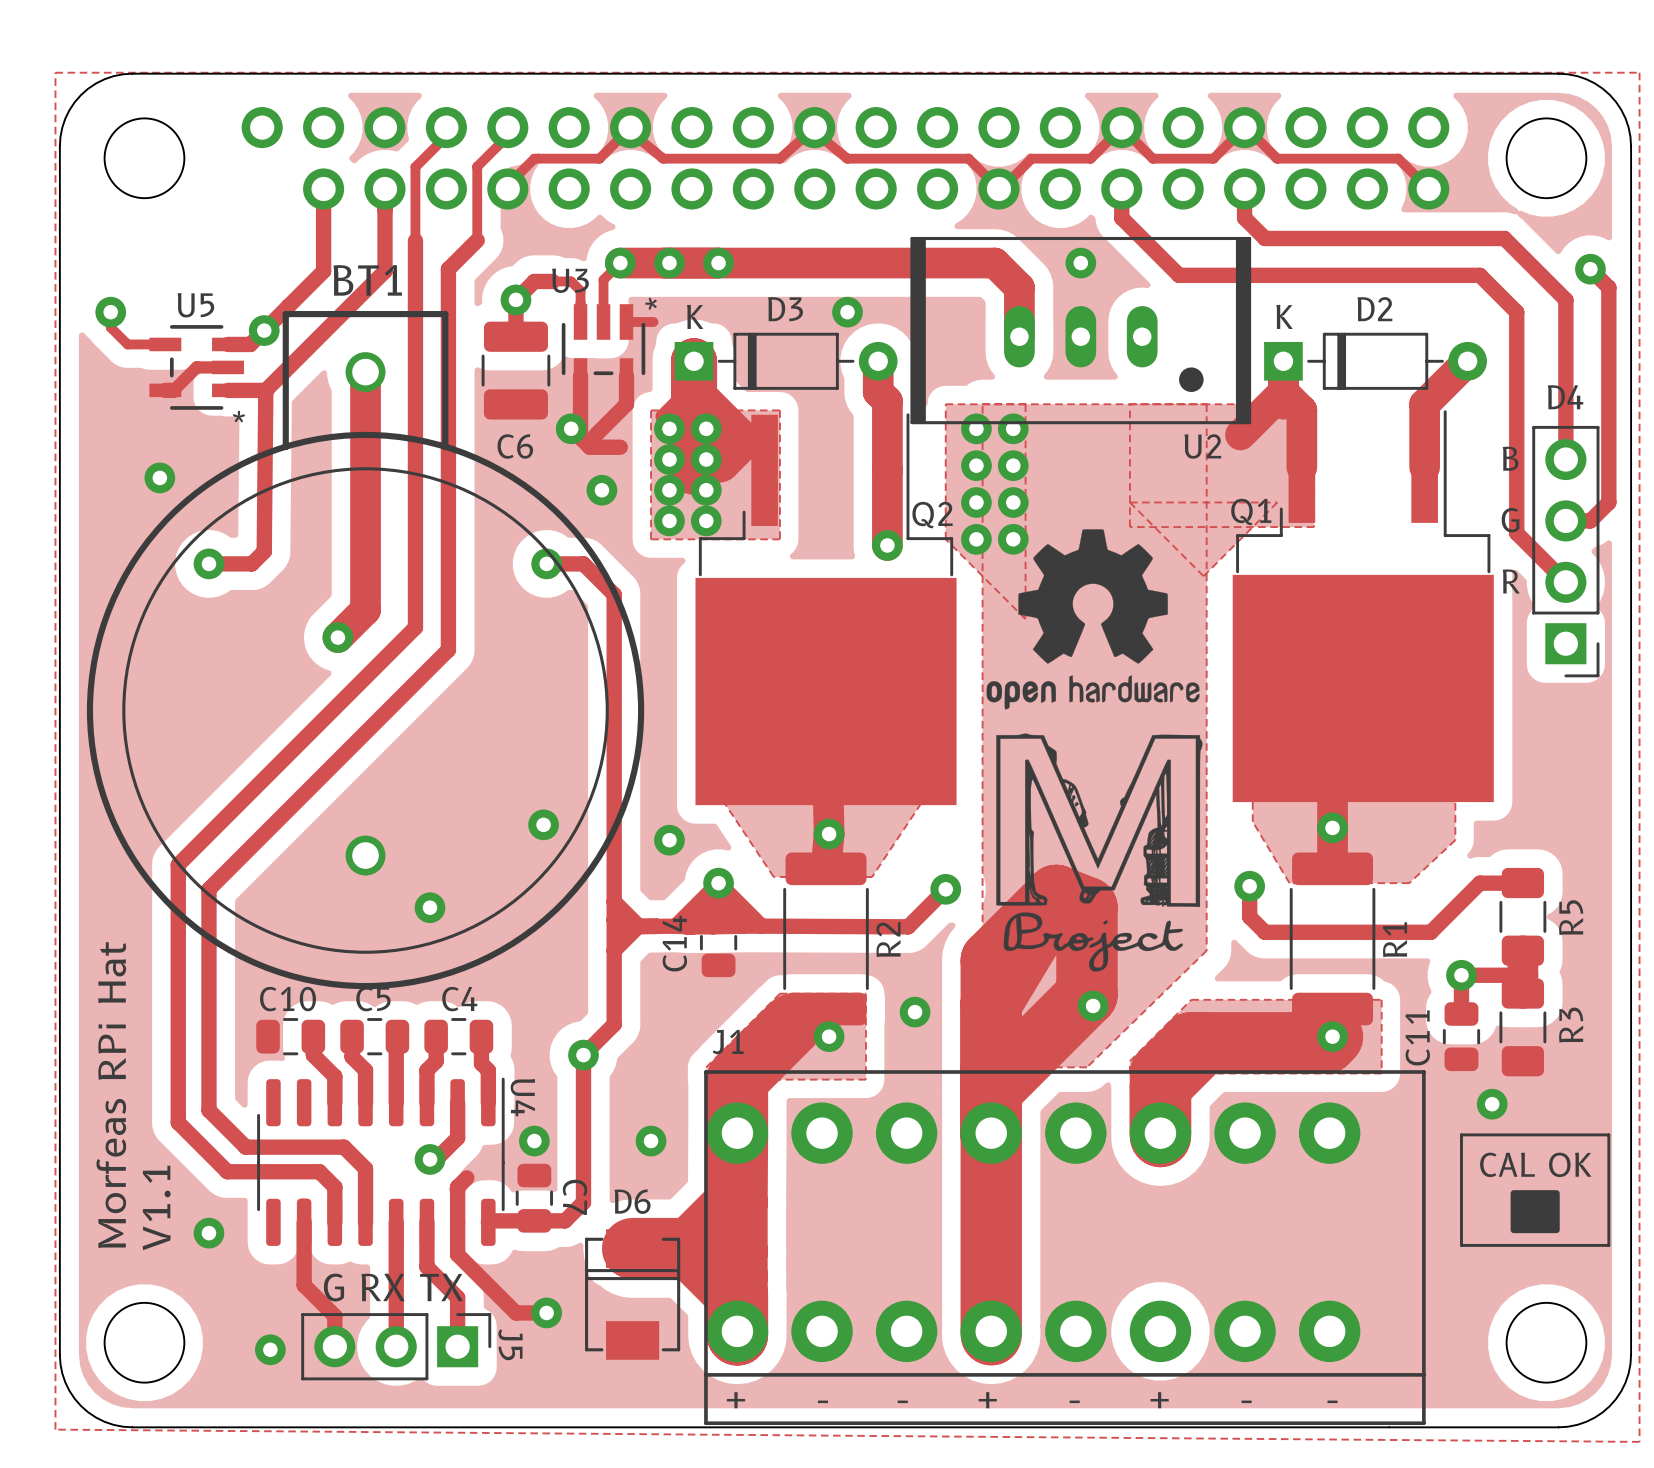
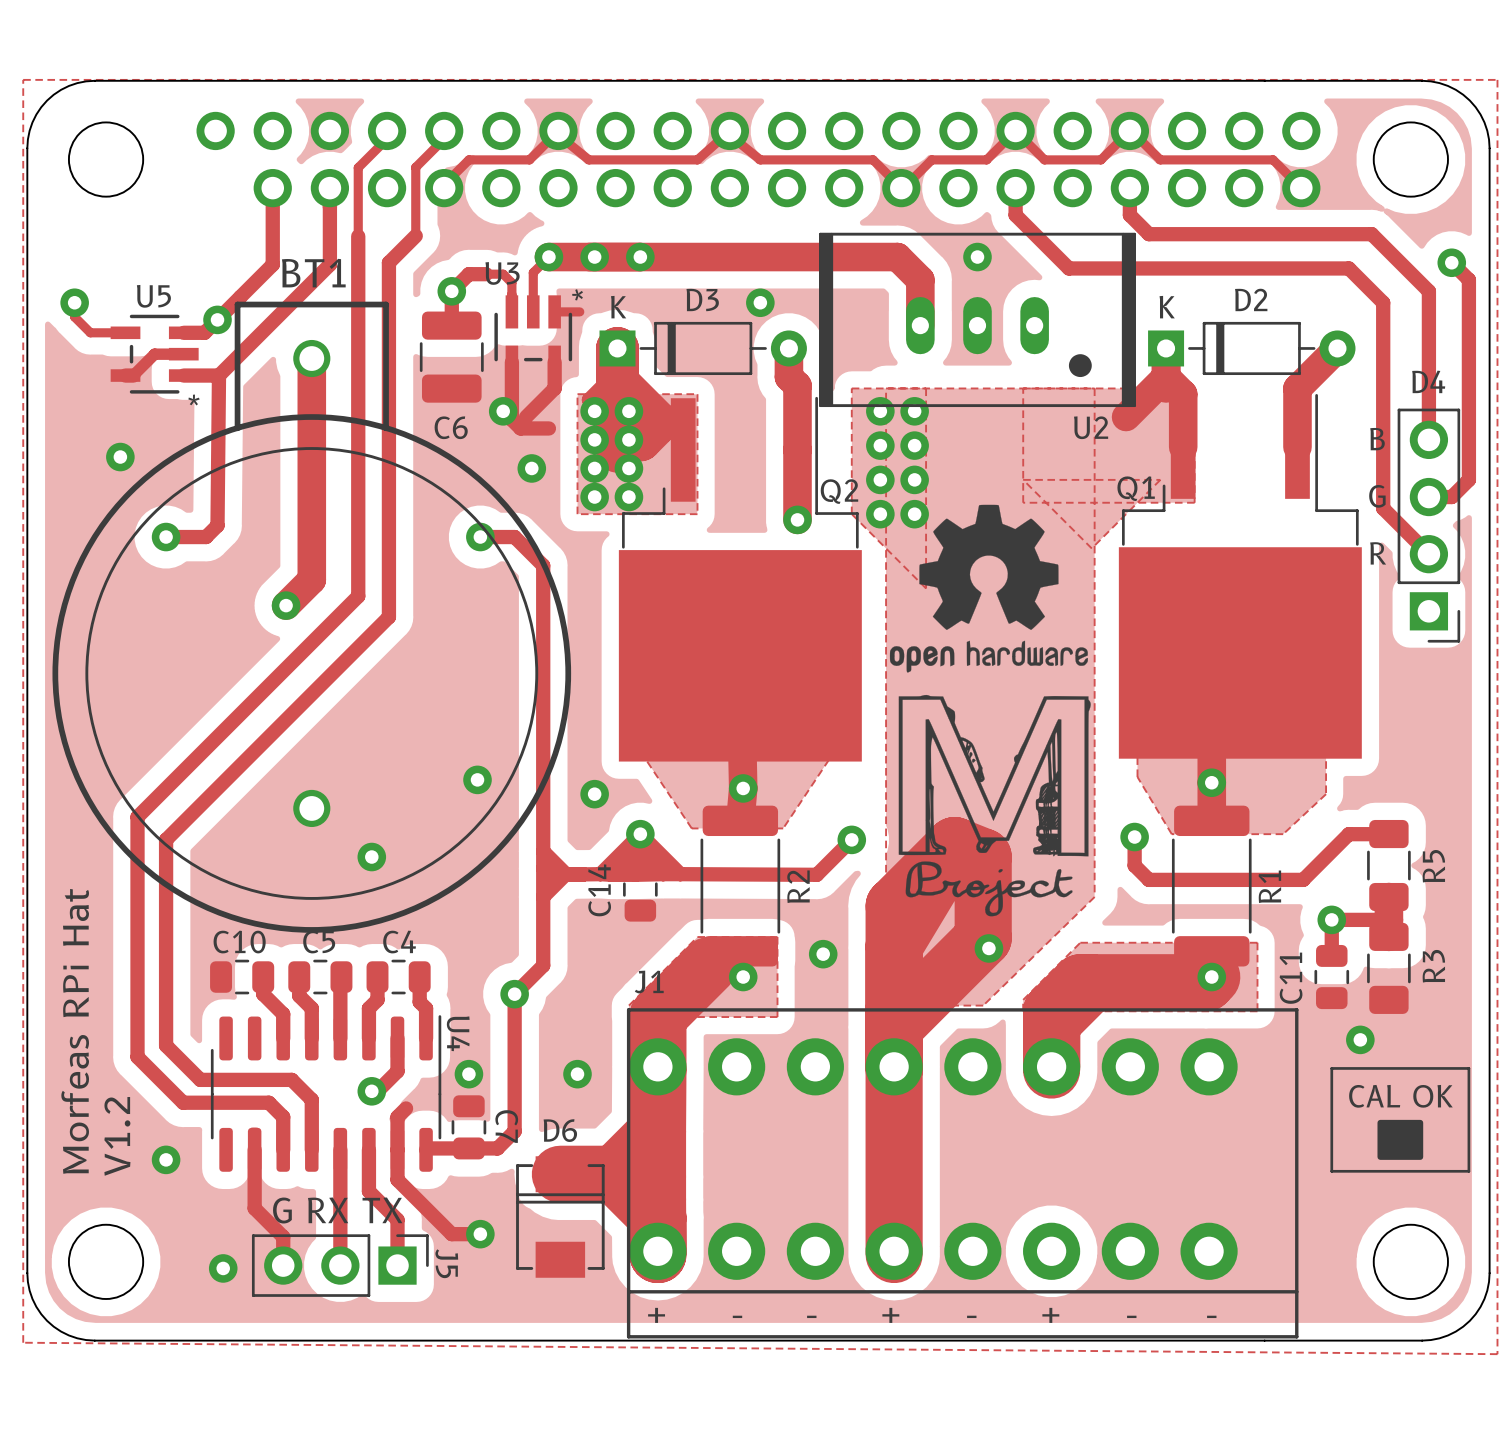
text: V1.1 (156, 1207) -> V1.2 (117, 1136)

